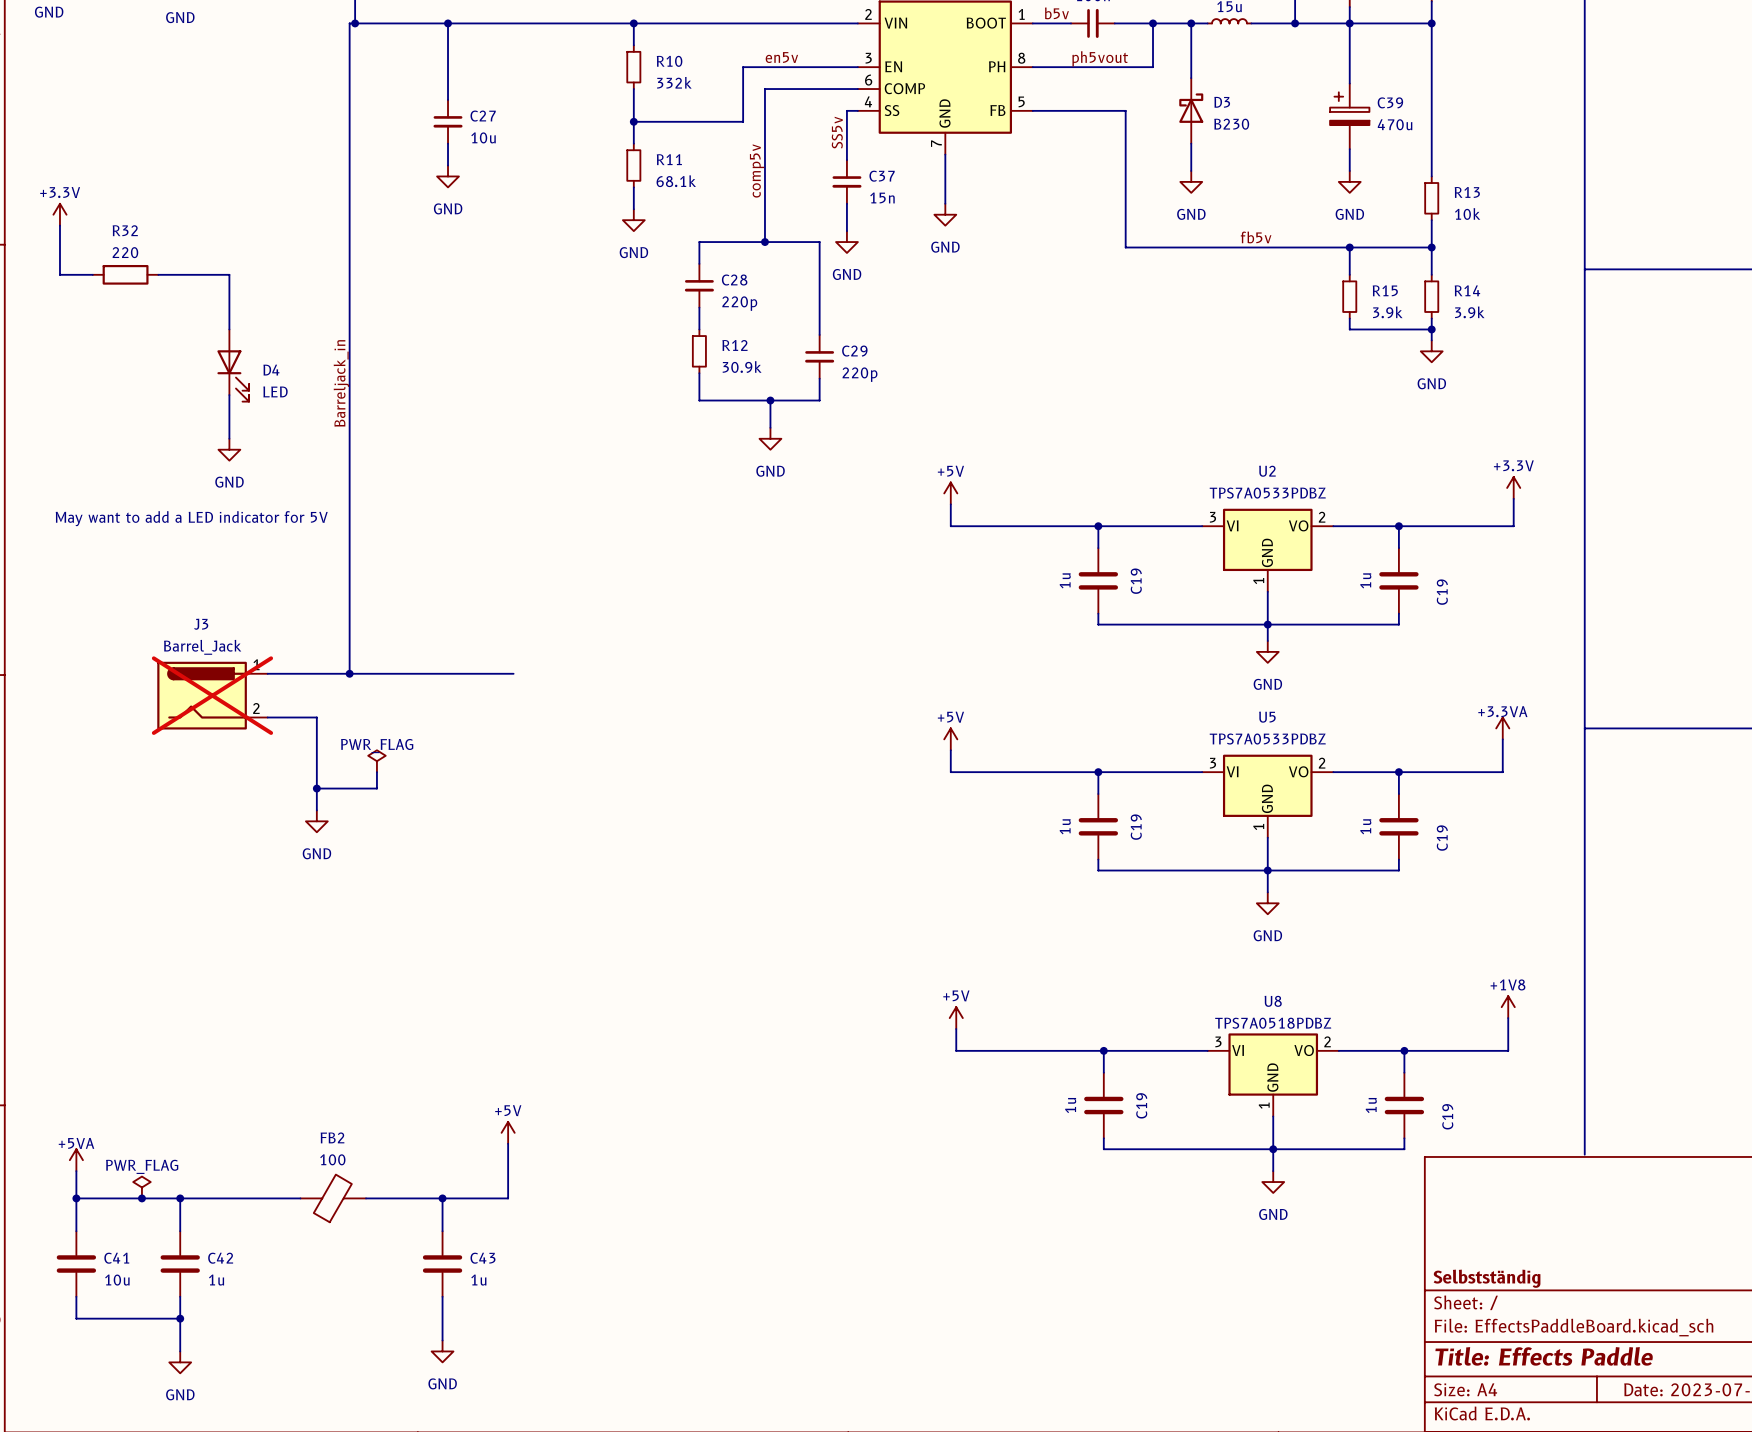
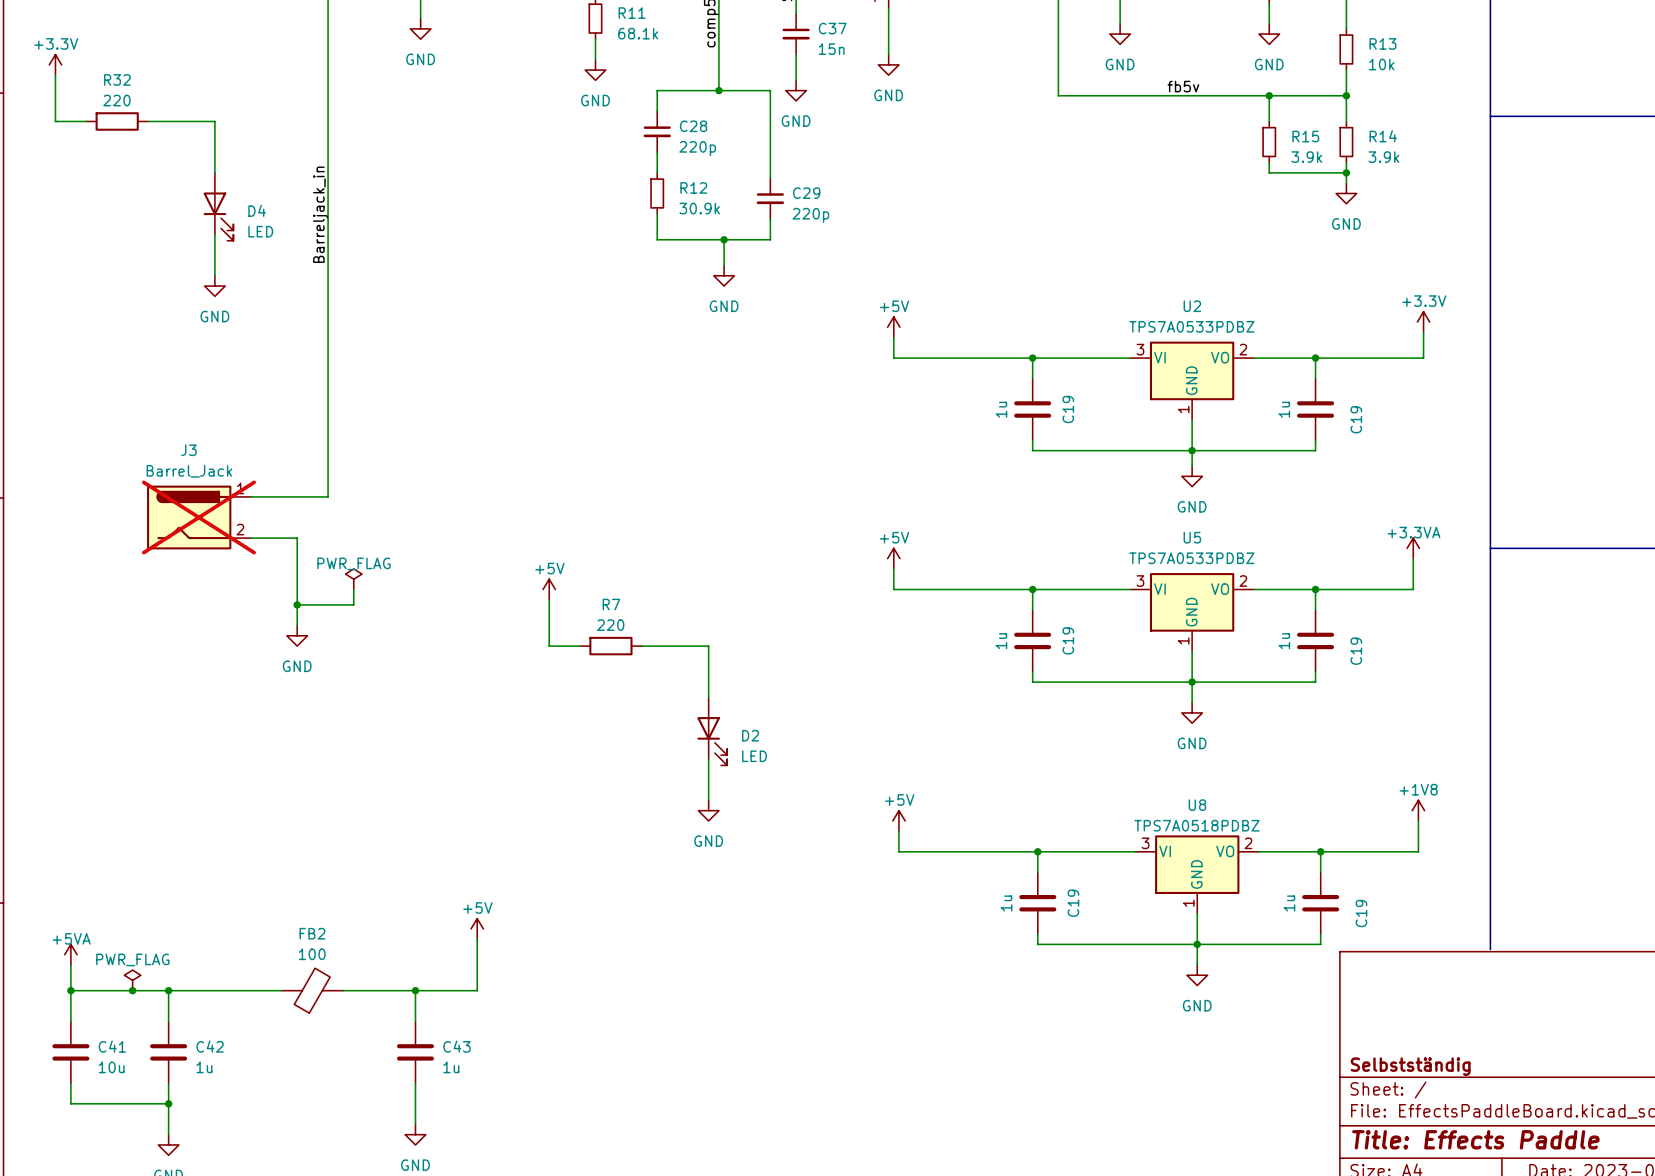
text: May want to add a LED indicator for 5V (191, 518) -> none
wire: (349, 673) (513, 673) -> none
junction: (349, 673) -> none
power symbol: none -> +5V (549, 589)
wire: none -> (549, 599) (549, 646) (580, 646)
R7: none -> 220 (610, 646)
wire: none -> (641, 646) (708, 646) (708, 697)
D2: none -> LED (712, 731)
wire: none -> (708, 759) (708, 800)
power symbol: none -> GND (708, 810)

